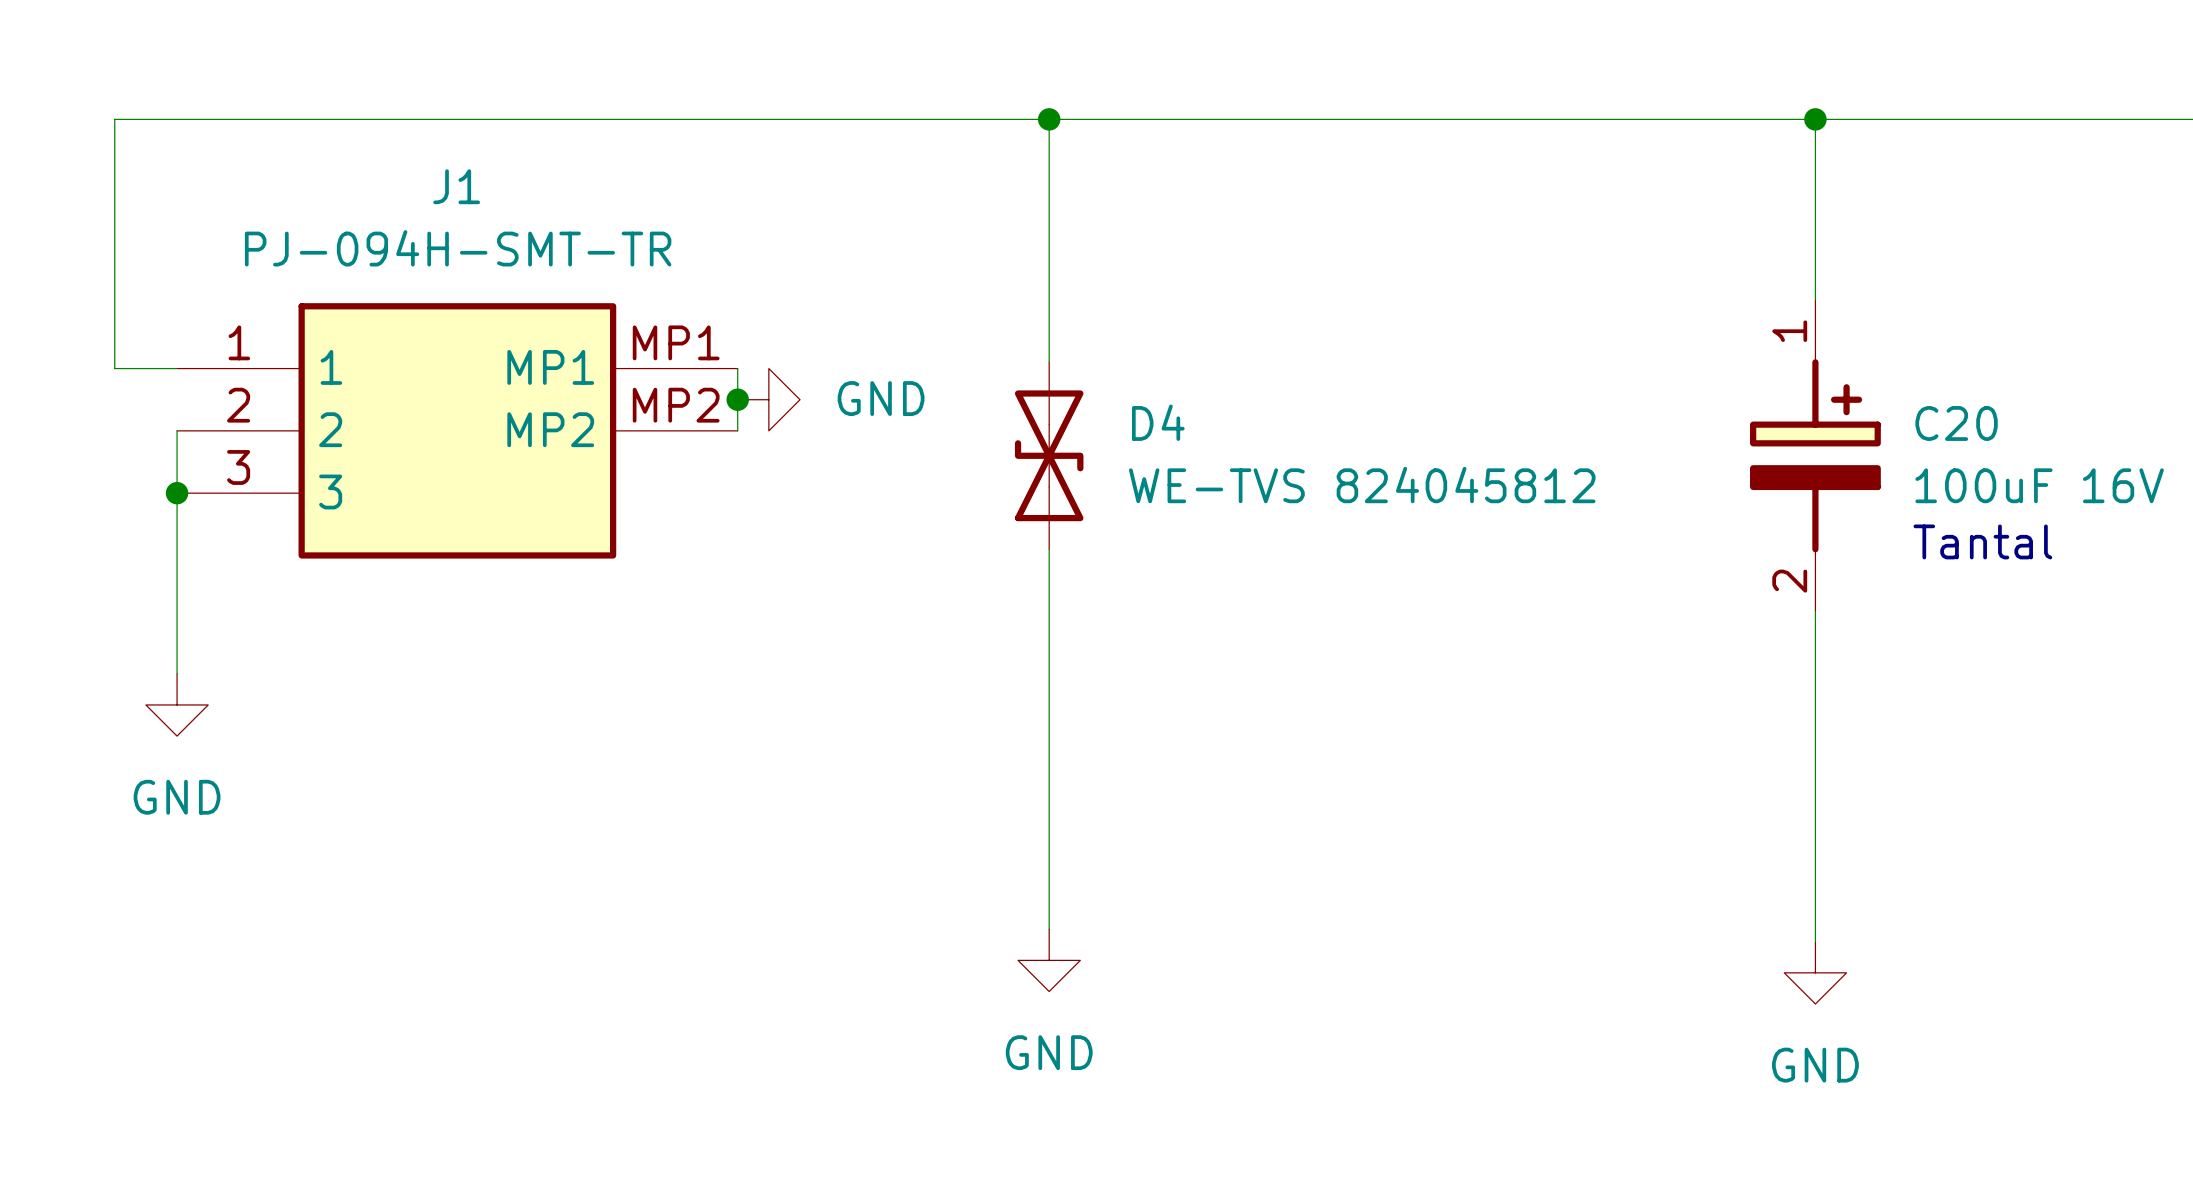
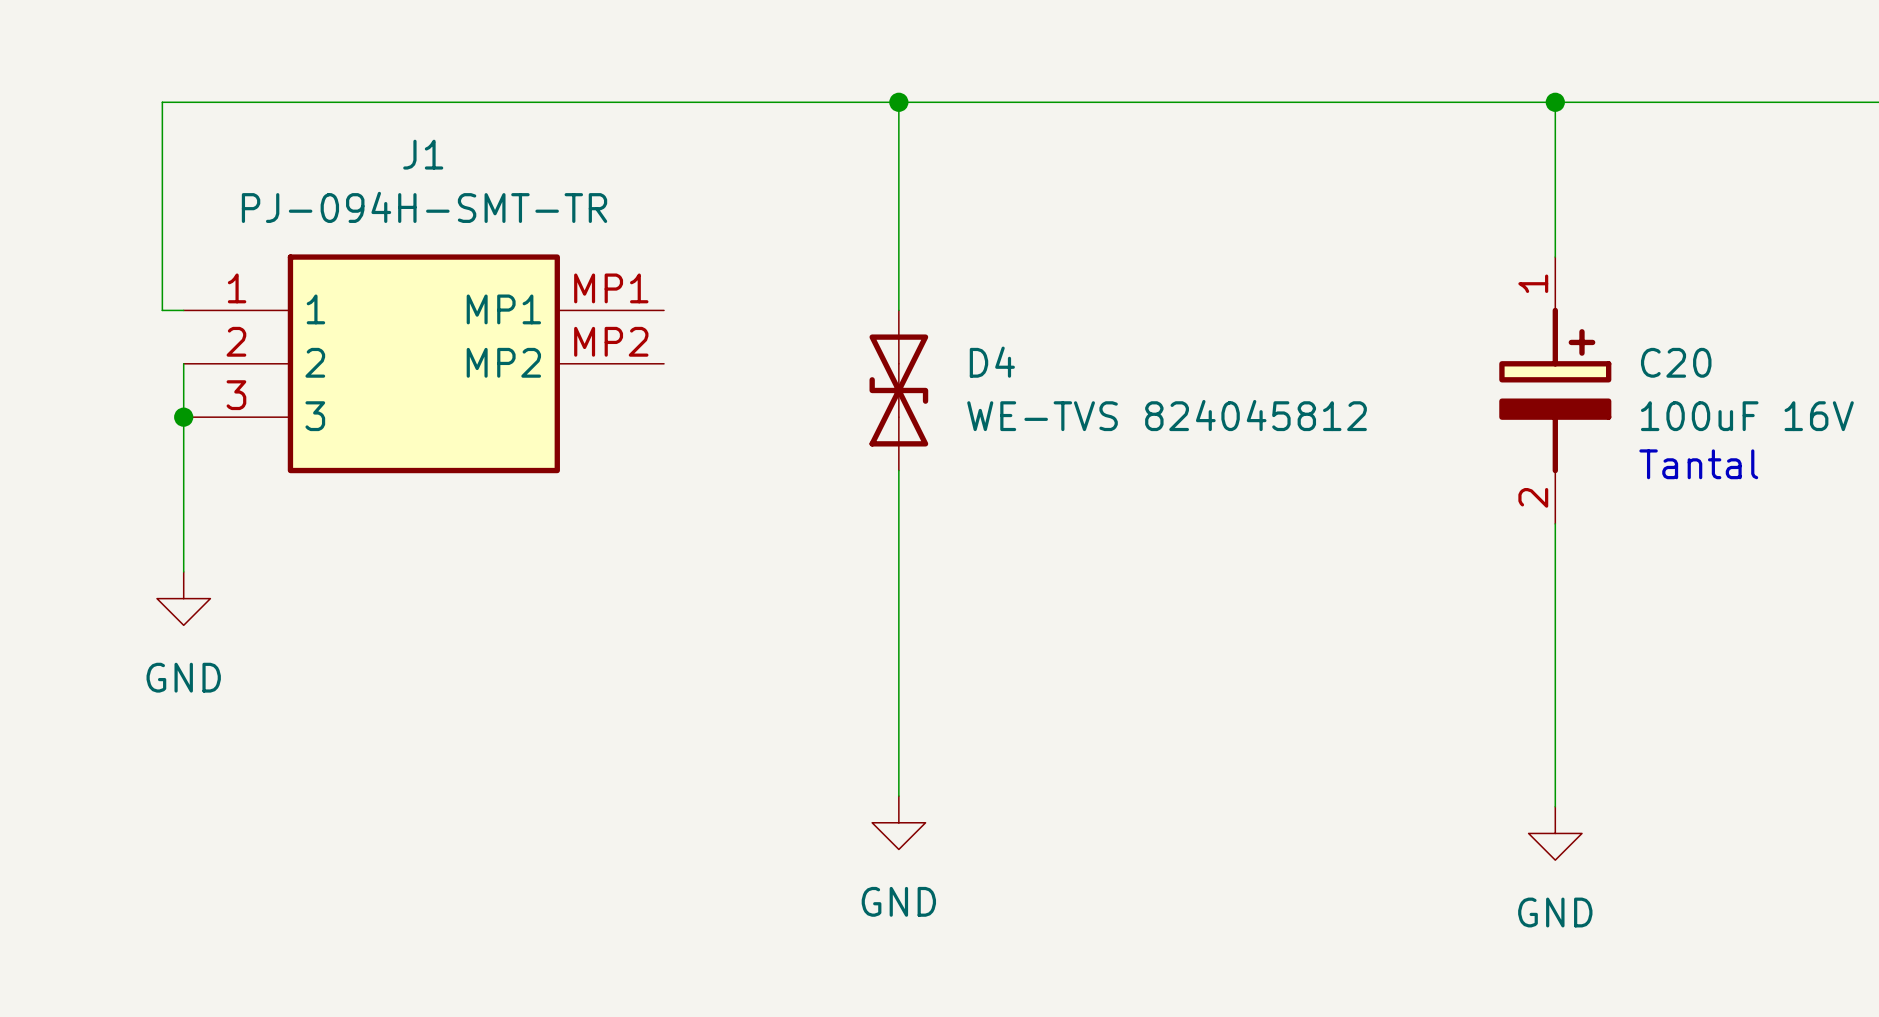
wire: (189, 119) (114, 119) (114, 368) (177, 368) -> (162, 102) (162, 310) (183, 310)
wire: (737, 368) (737, 430) -> none
junction: (737, 399) -> none
power symbol: GND (768, 399) -> none
wire: (177, 430) (177, 673) -> (183, 363) (183, 571)
J1 position: (457, 430) -> (423, 363)
junction position: (177, 493) -> (183, 417)
power symbol position: GND (177, 704) -> GND (183, 598)

